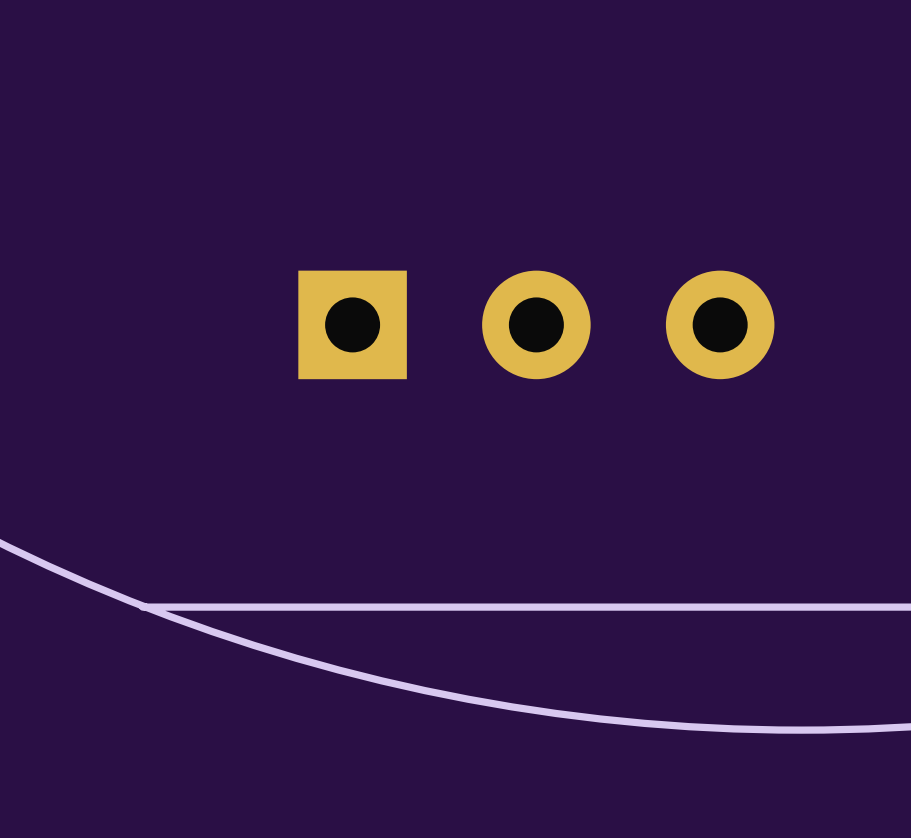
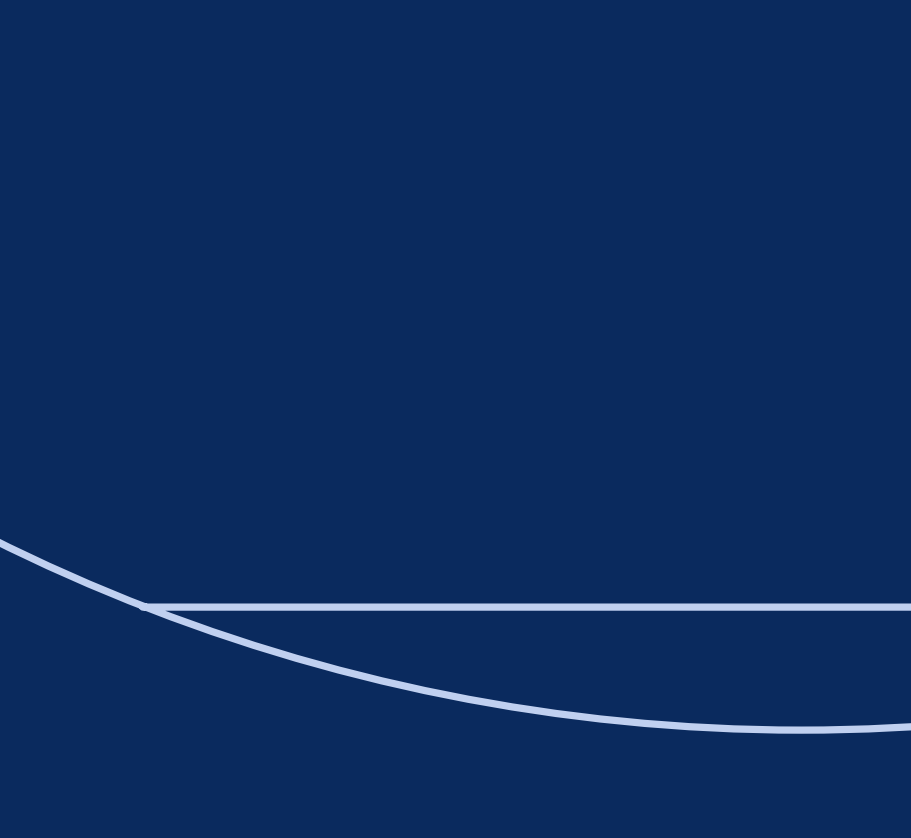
part: (536, 324) -> none

